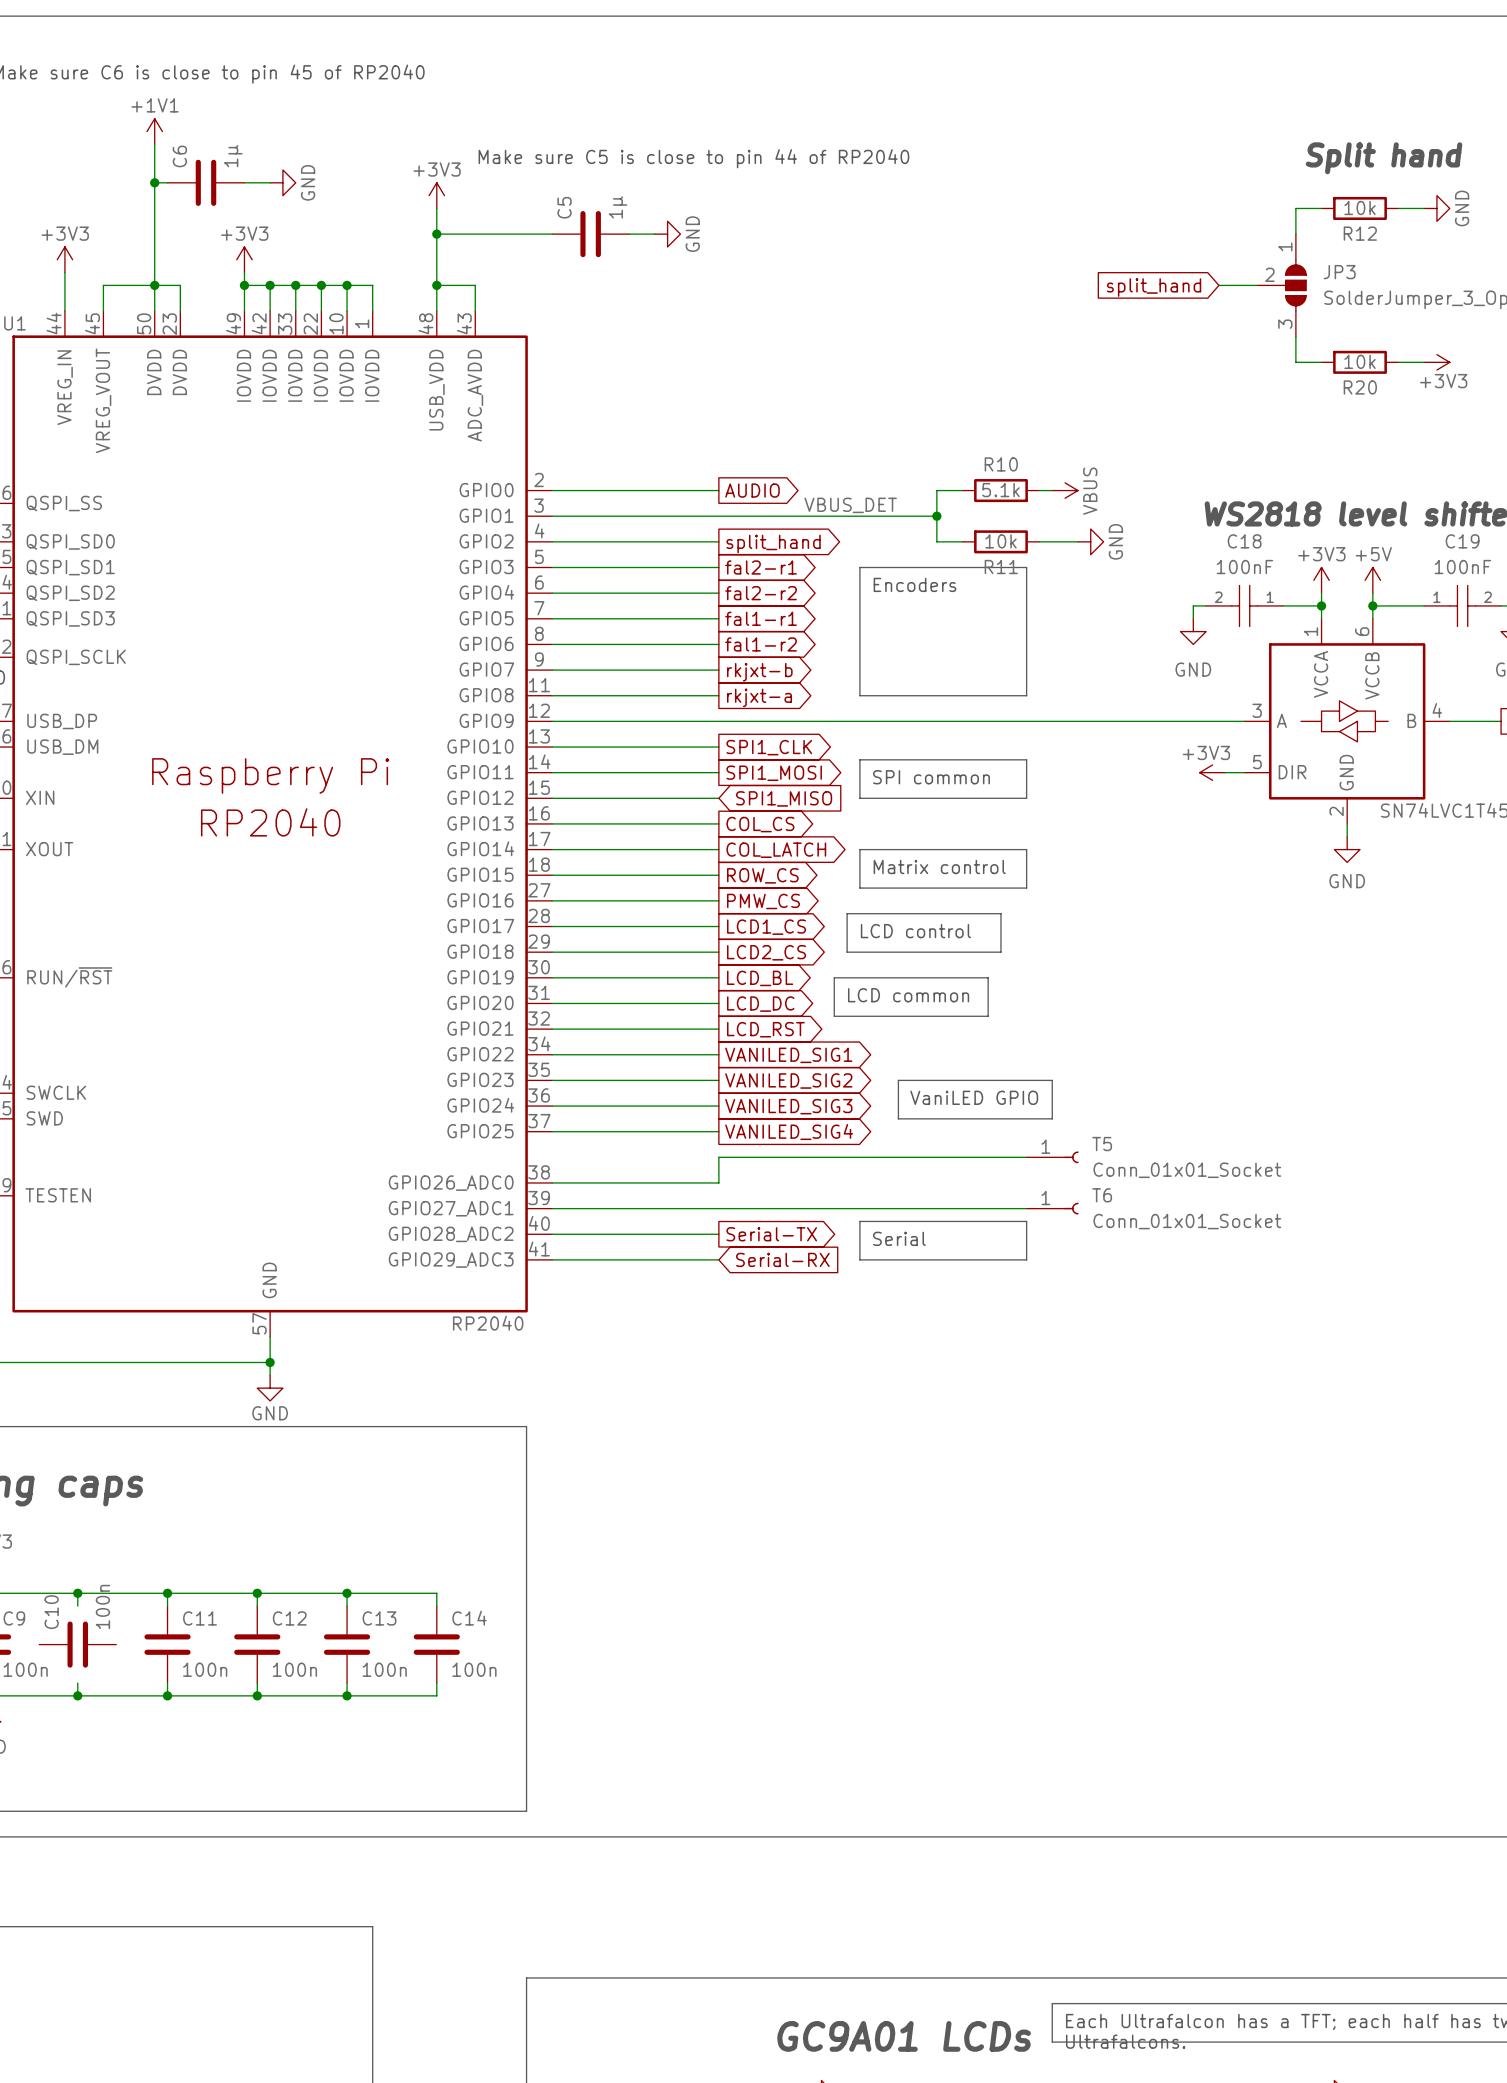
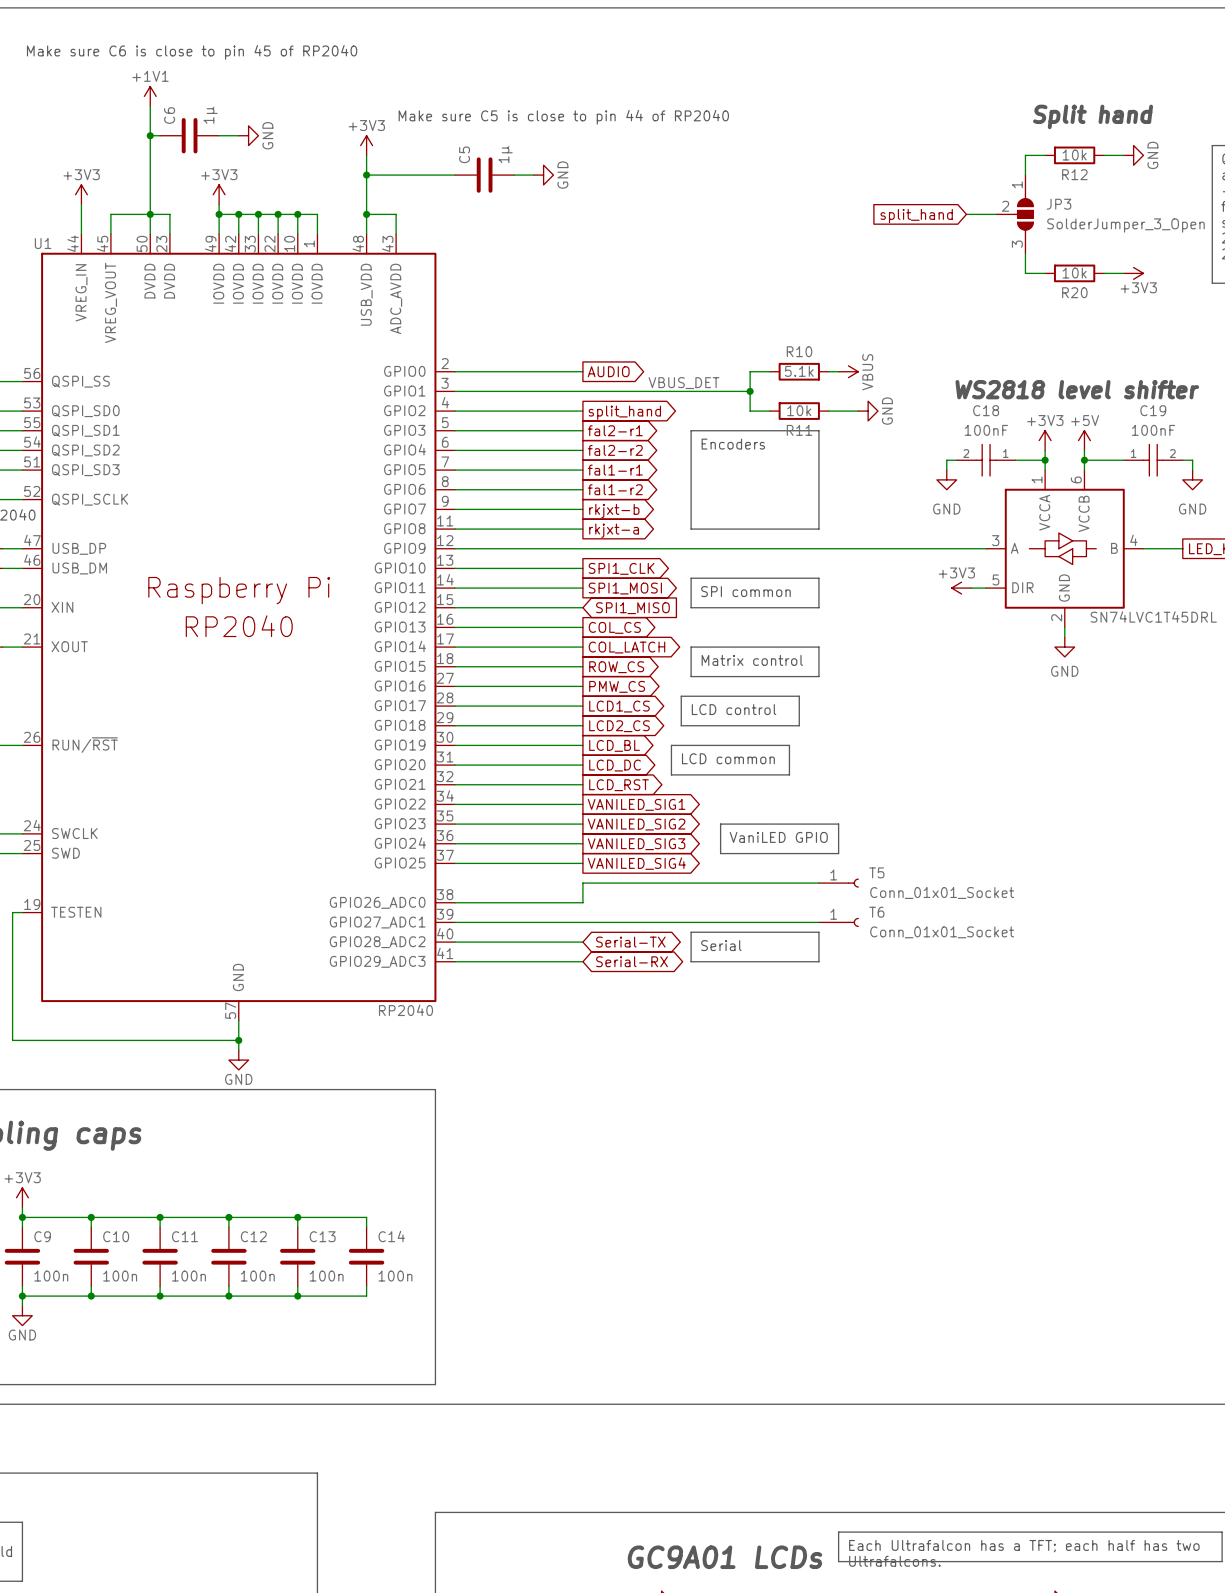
global label shape: output (771, 1234) -> bidirectional (630, 942)
global label shape: input (782, 1259) -> bidirectional (632, 961)
C10 rotation: 0° (77, 1644) -> 90° clockwise (91, 1256)

